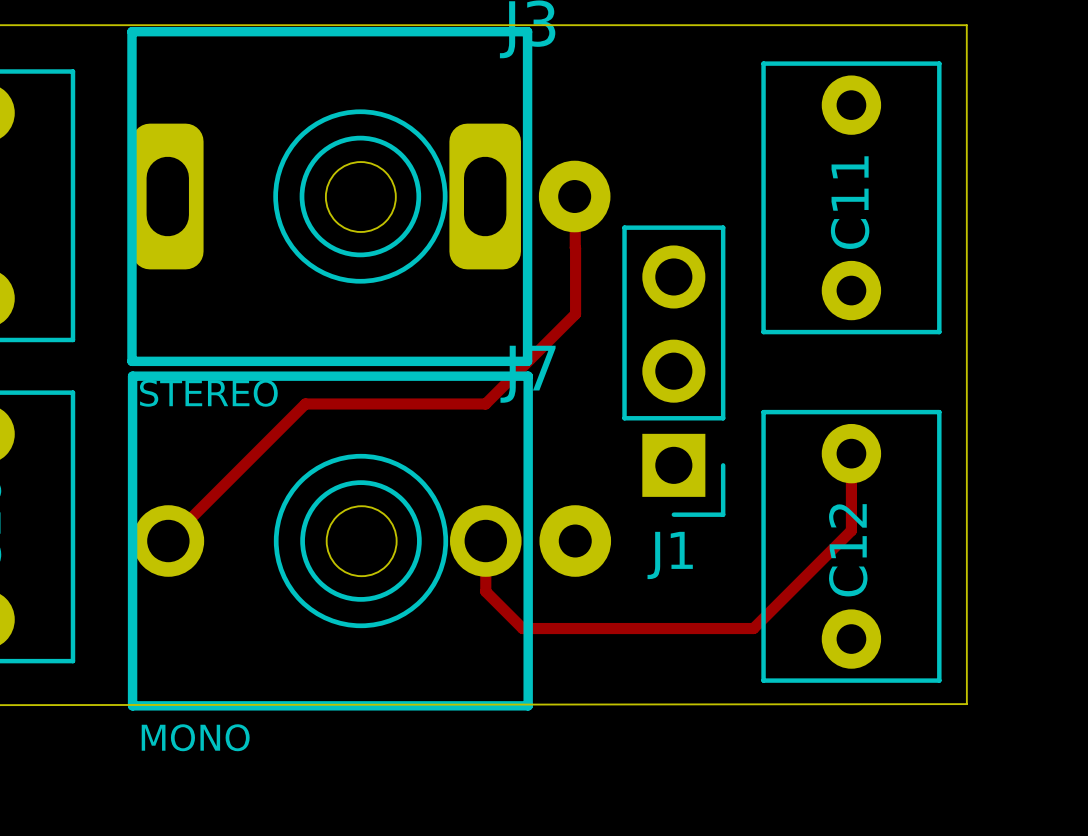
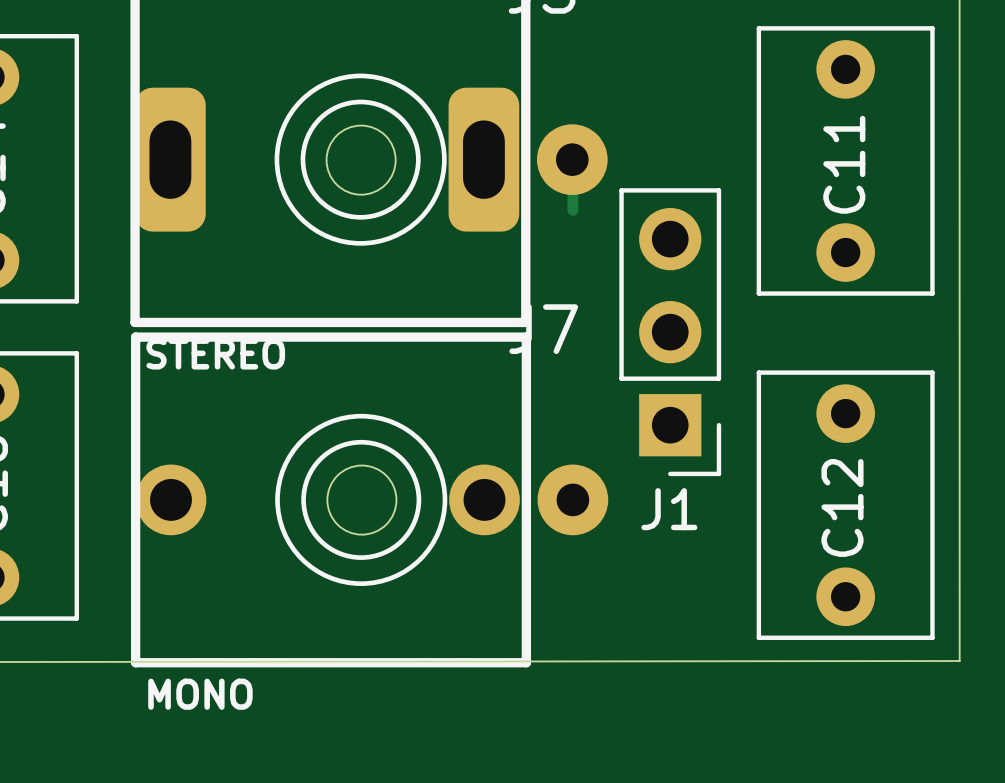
track: (575, 248) (575, 314) (485, 403) (305, 403) (168, 541) -> none
track: (851, 453) (851, 530) (753, 628) (522, 628) (485, 591) (485, 541) -> none

